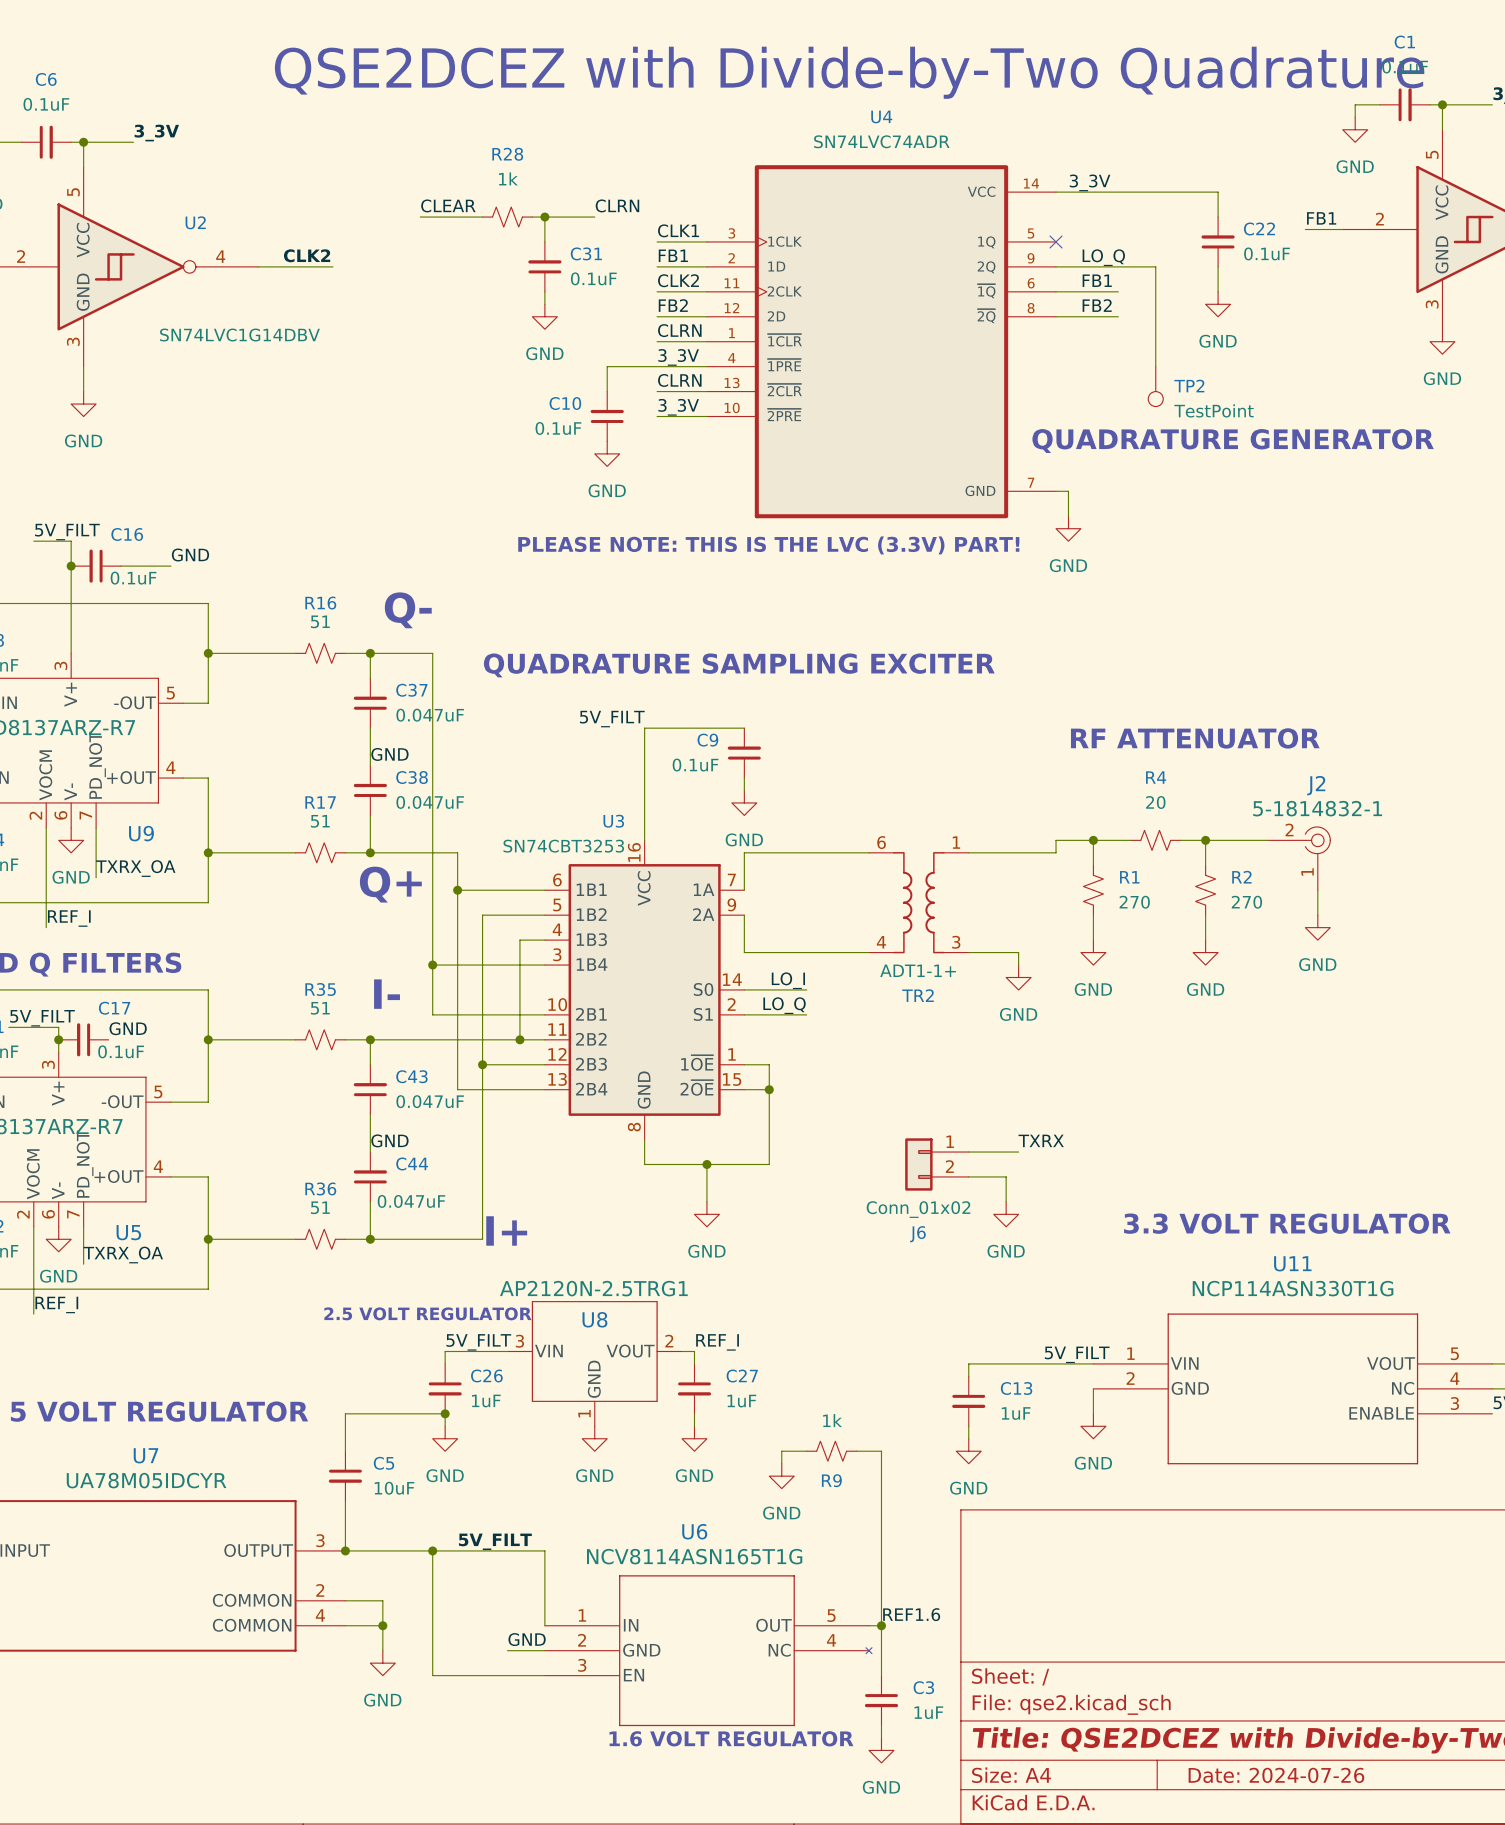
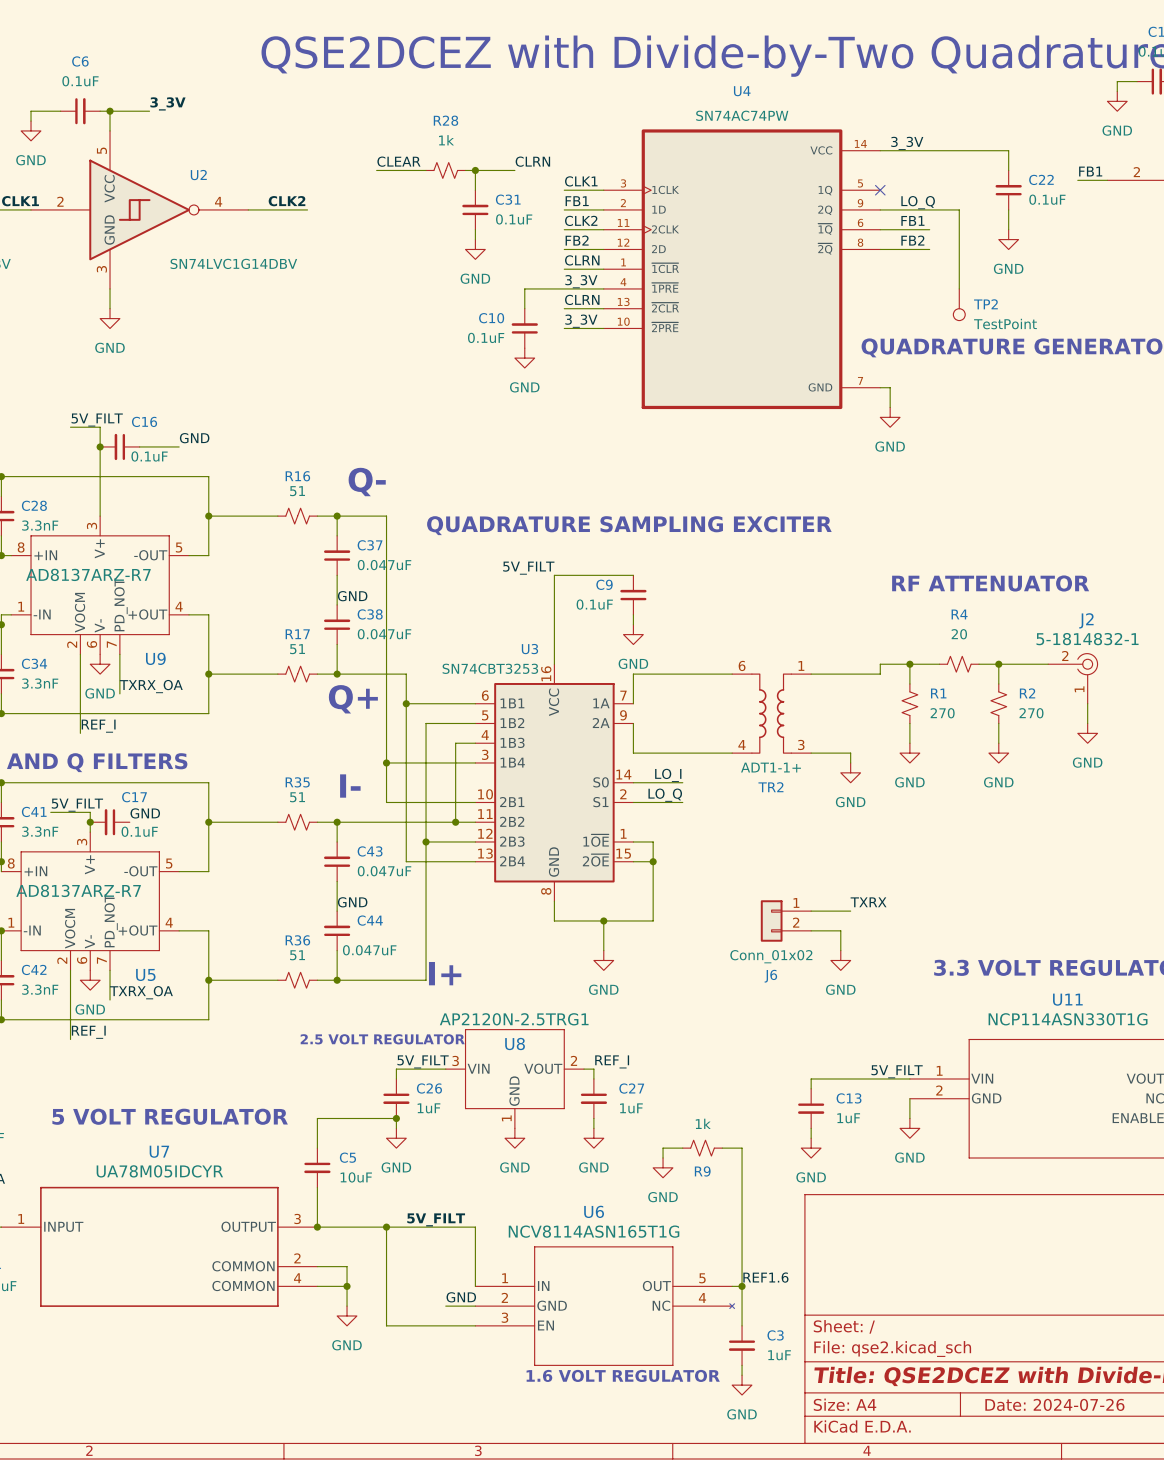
U4 value: SN74LVC74ADR (881, 141) -> SN74AC74PW (742, 115)
text: PLEASE NOTE: THIS IS THE LVC (3.3V) PART! (768, 545) -> none

